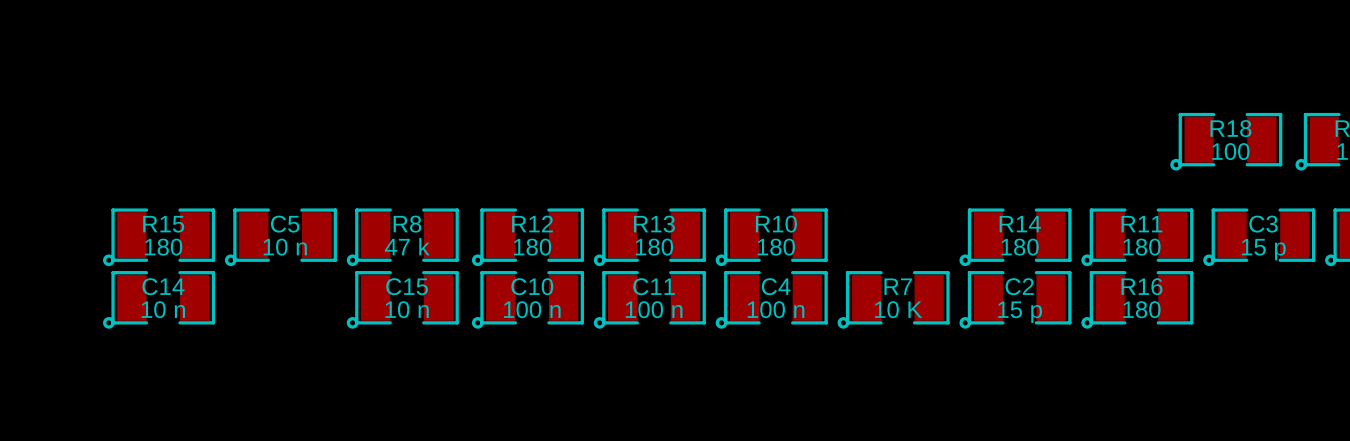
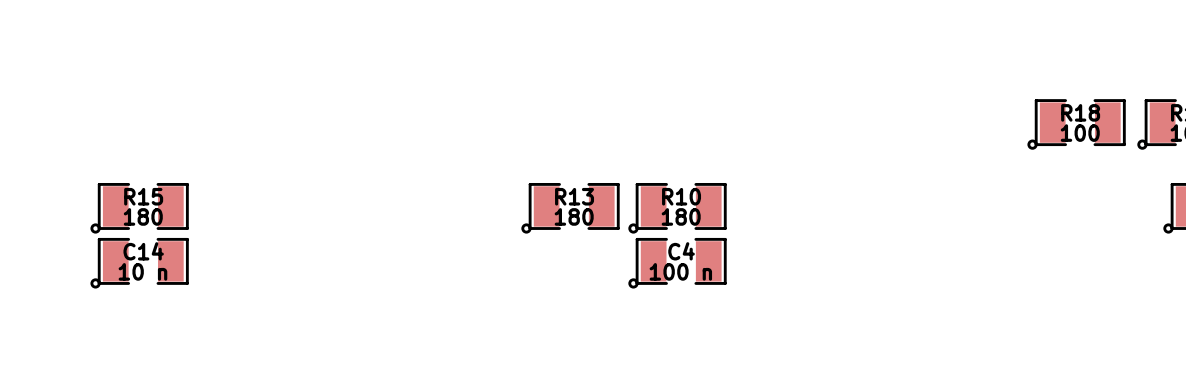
C5: 10 n (280, 237) -> none
R8: 47 k (402, 237) -> none
R12: 180 (527, 237) -> none
R14: 180 (1015, 237) -> none
R11: 180 (1137, 237) -> none
C3: 15 p (1259, 237) -> none
C15: 10 n (402, 299) -> none
C10: 100 n (527, 299) -> none
C11: 100 n (649, 299) -> none
R7: 10 K (893, 299) -> none
C2: 15 p (1015, 299) -> none
R16: 180 (1137, 299) -> none

